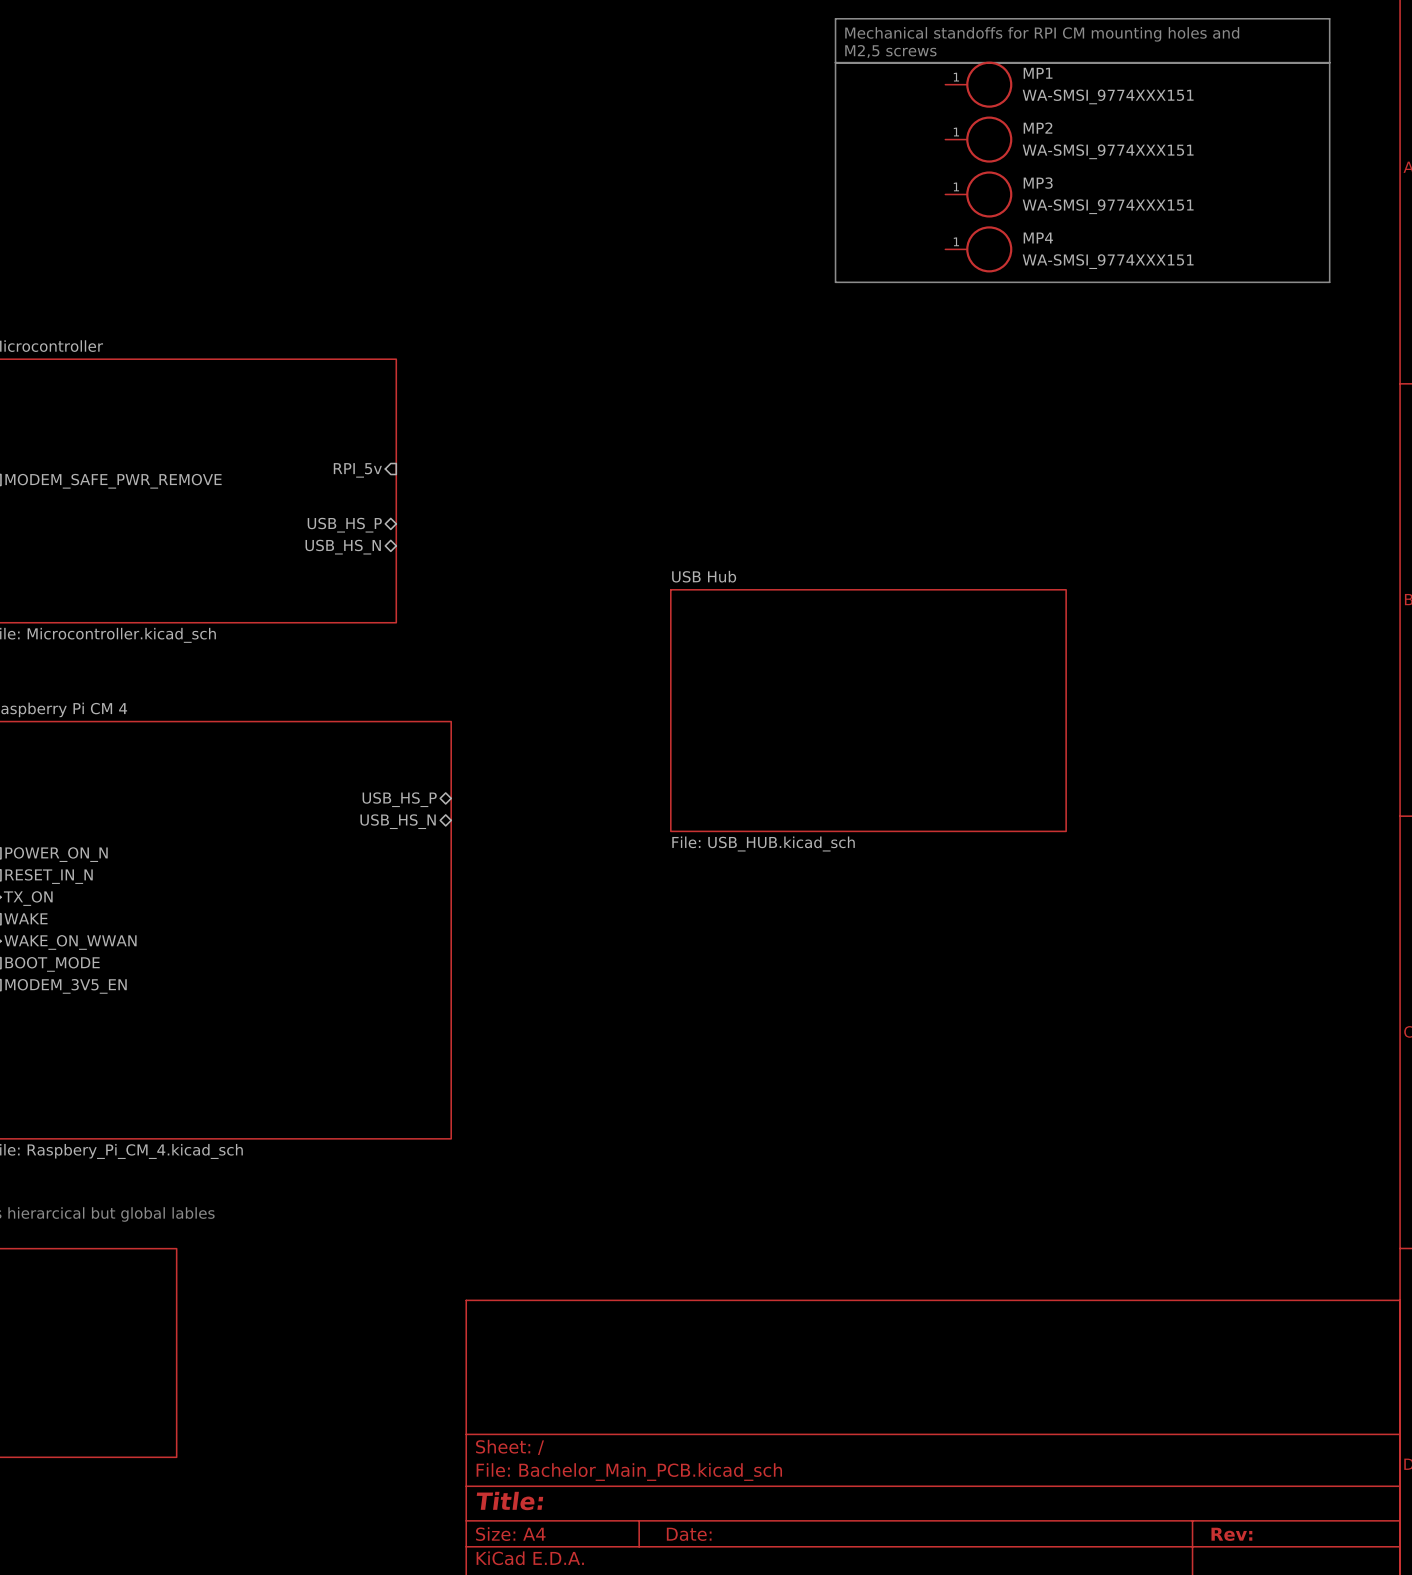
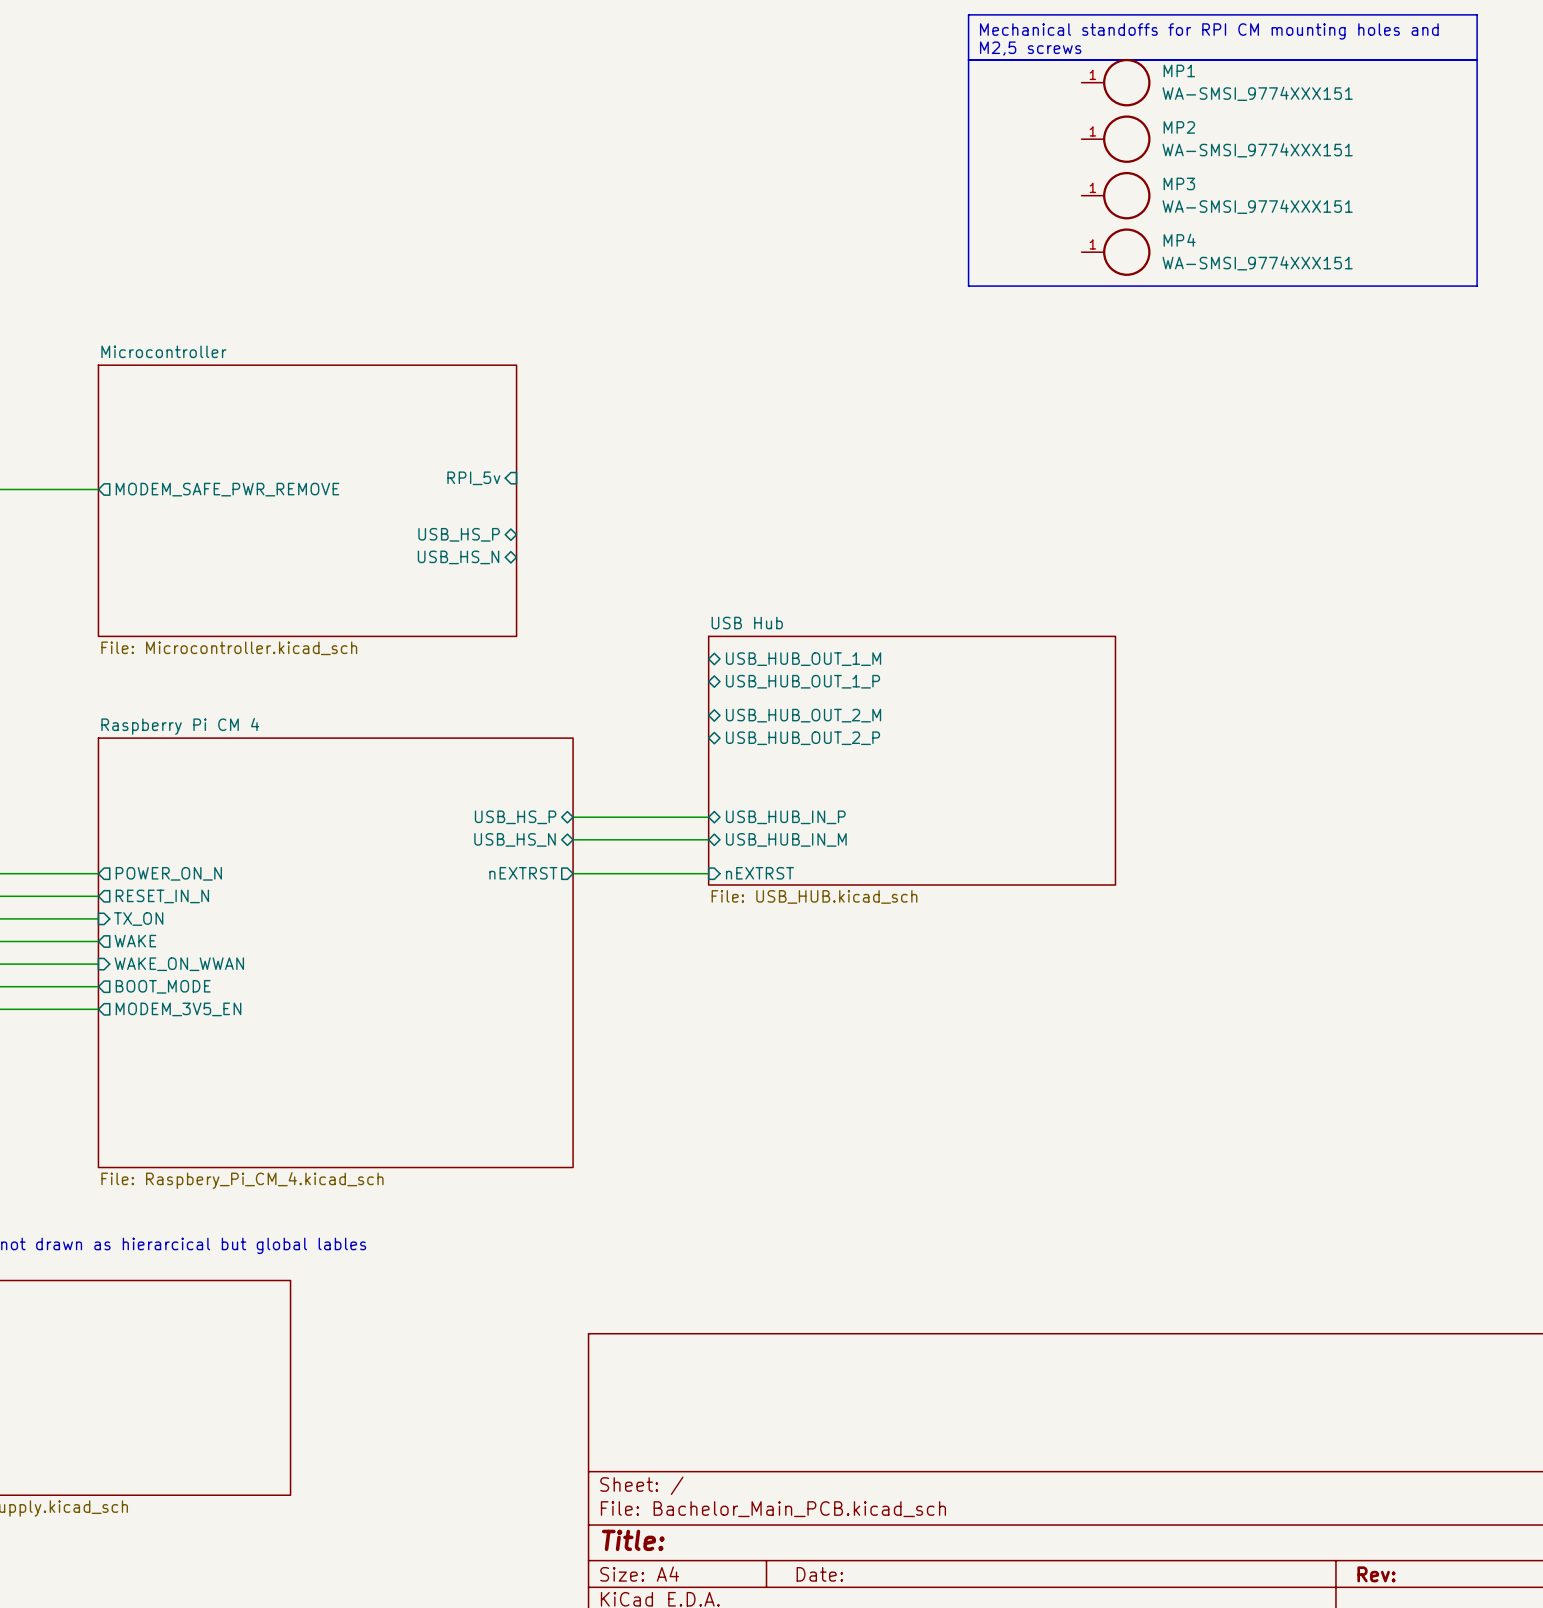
sheet pin: none -> USB_HUB_OUT_1_M (803, 659)
sheet pin: none -> USB_HUB_OUT_1_P (803, 681)
sheet pin: none -> USB_HUB_OUT_2_M (803, 715)
sheet USB Hub position: (868, 710) -> (912, 760)
sheet pin: none -> USB_HUB_OUT_2_P (803, 738)
wire: none -> (573, 817) (708, 817)
sheet pin: none -> USB_HUB_IN_P (785, 817)
wire: none -> (573, 839) (708, 839)
sheet pin: none -> USB_HUB_IN_M (786, 839)
sheet pin: none -> nEXTRST (523, 873)
sheet pin: none -> nEXTRST (759, 873)
wire: none -> (573, 873) (708, 873)

